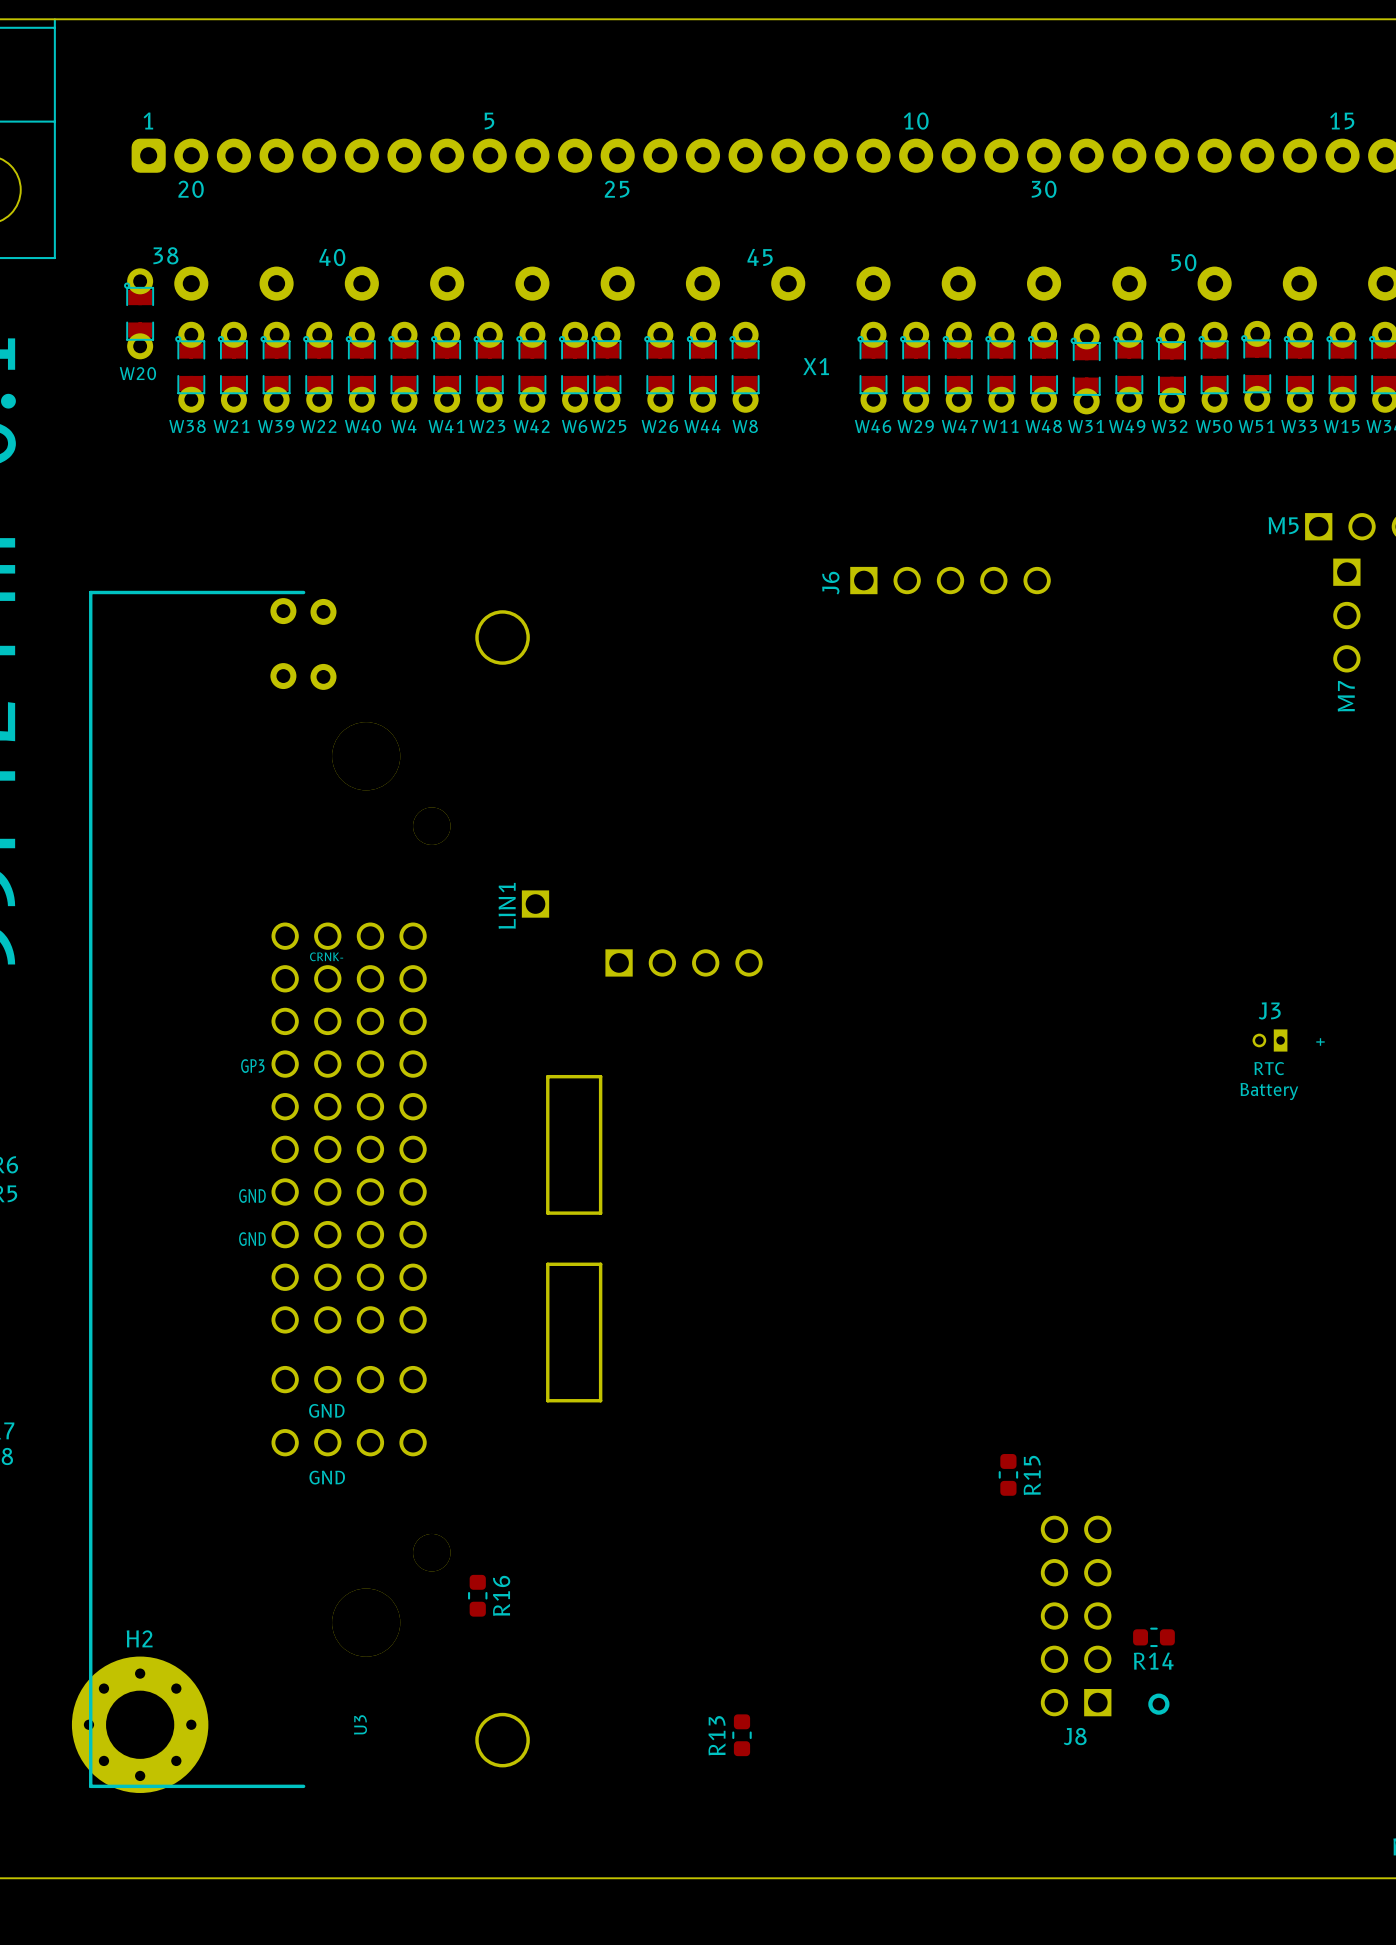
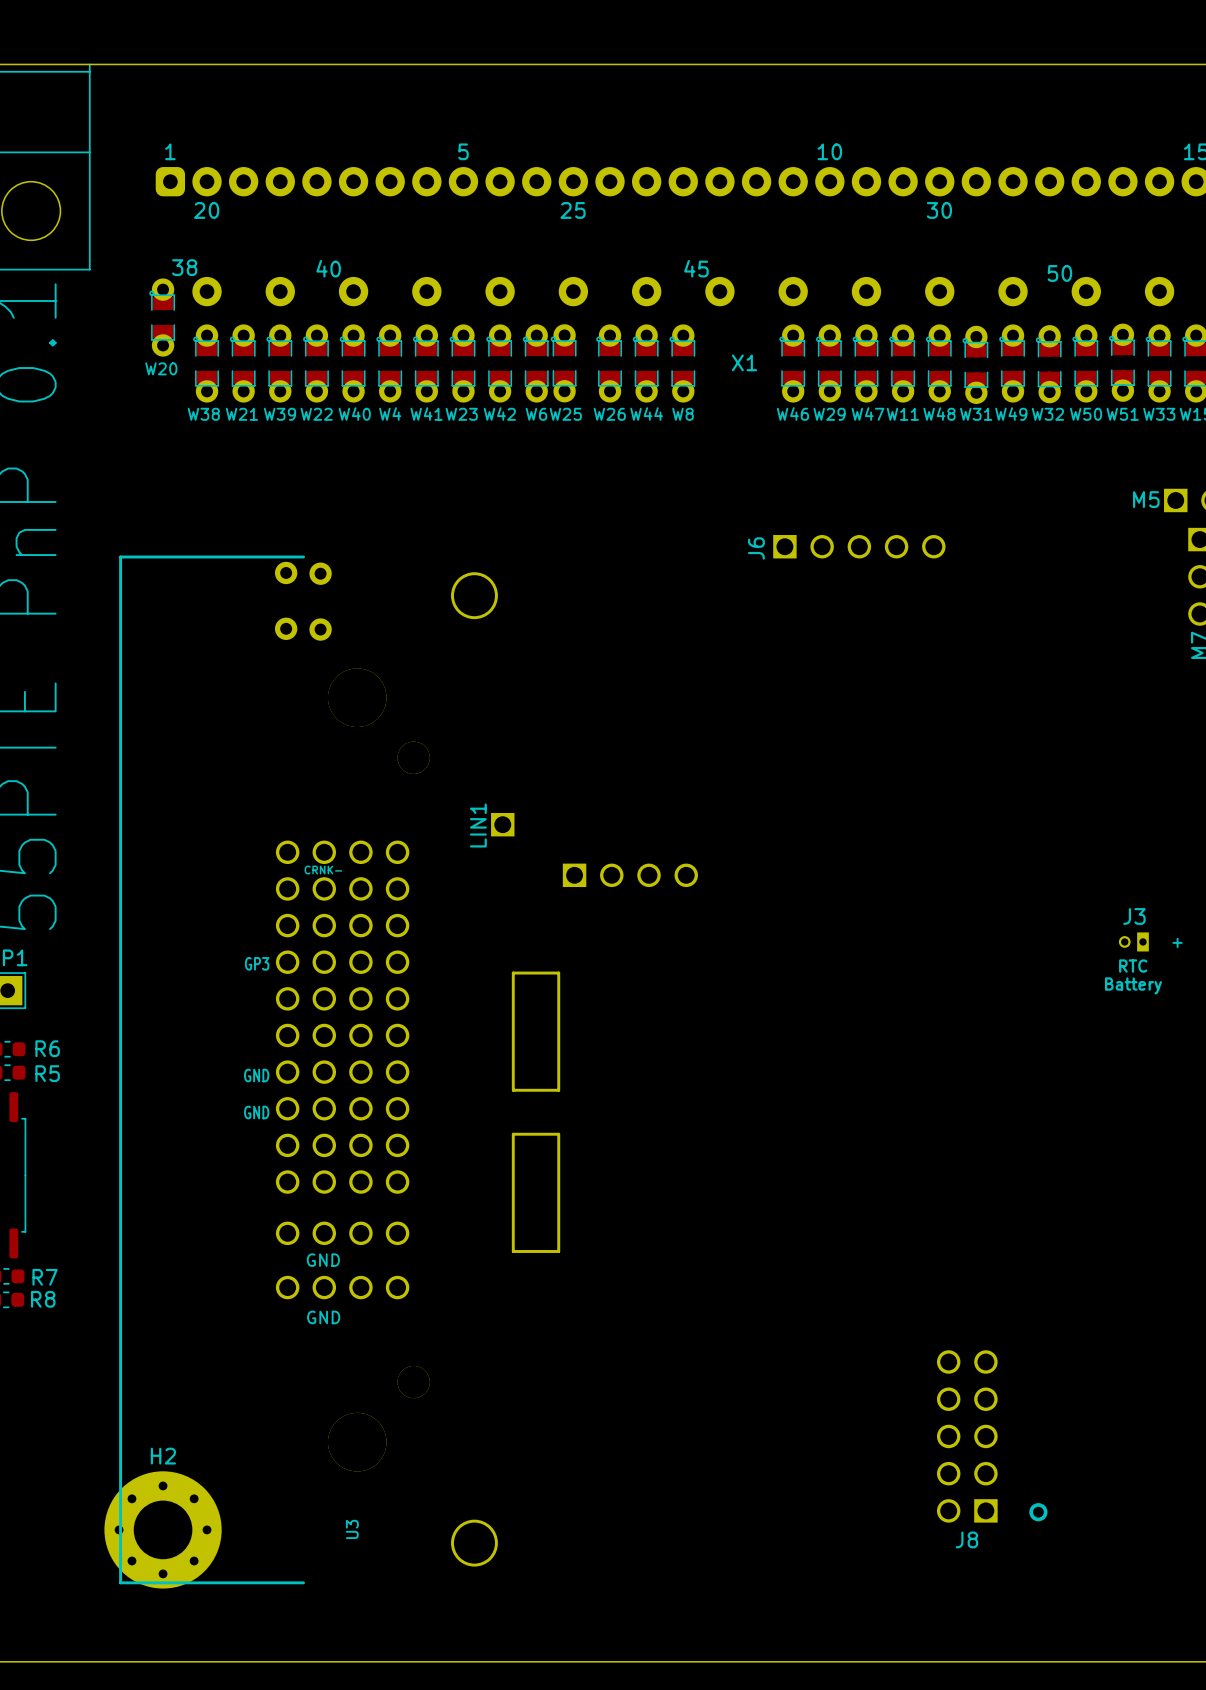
R15: (1008, 1474) -> none
R16: (477, 1595) -> none
R14: (1153, 1637) -> none
R13: (742, 1735) -> none

